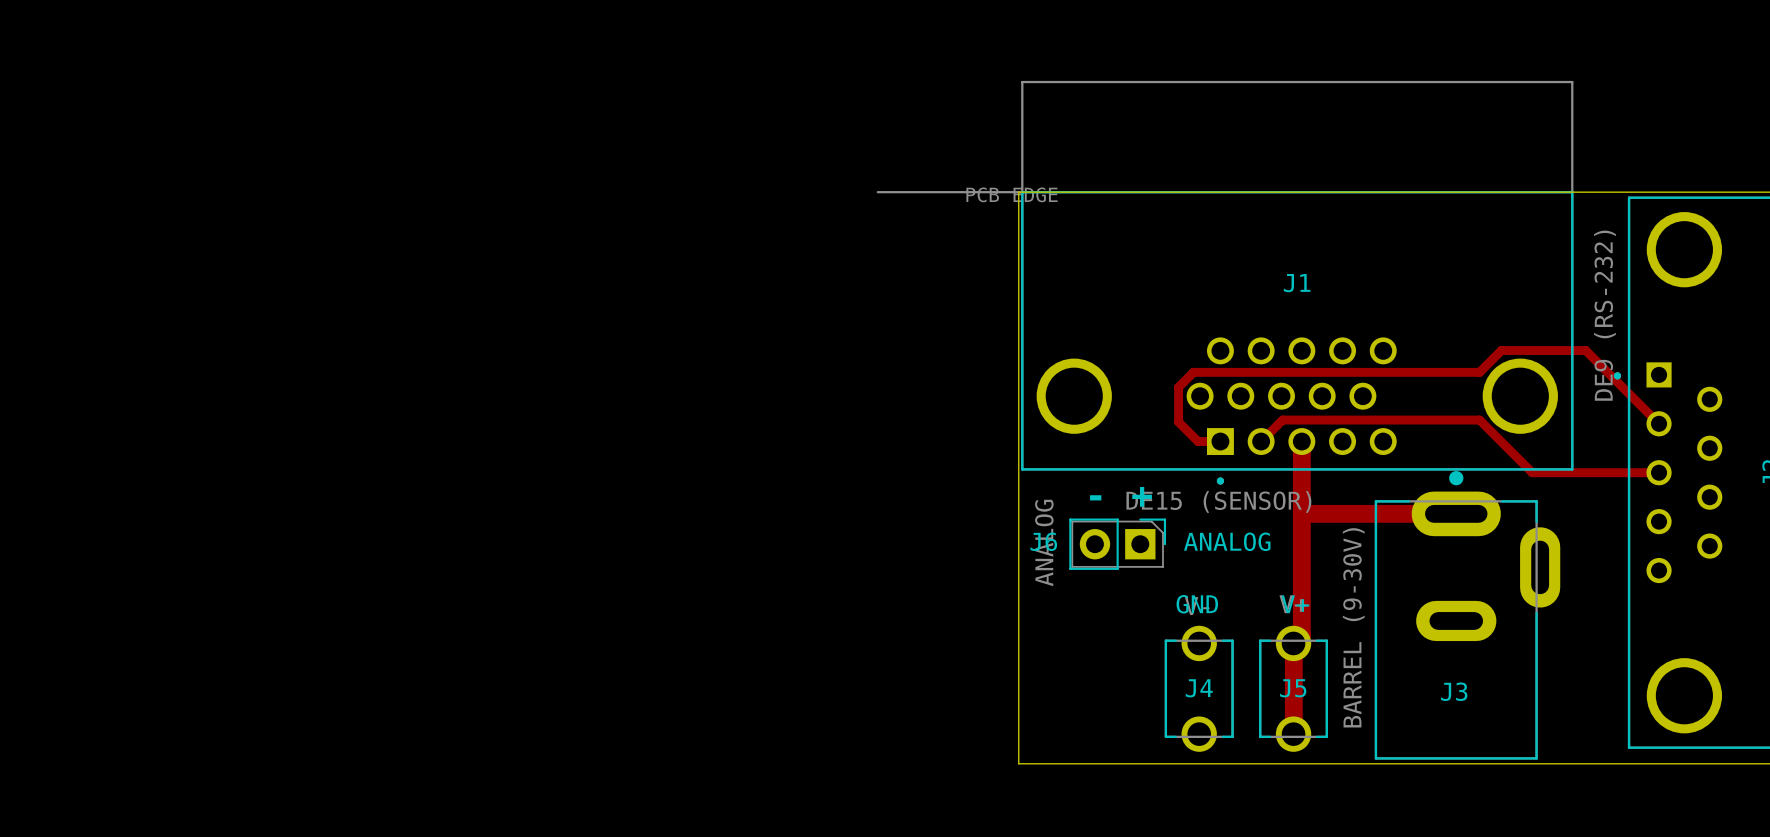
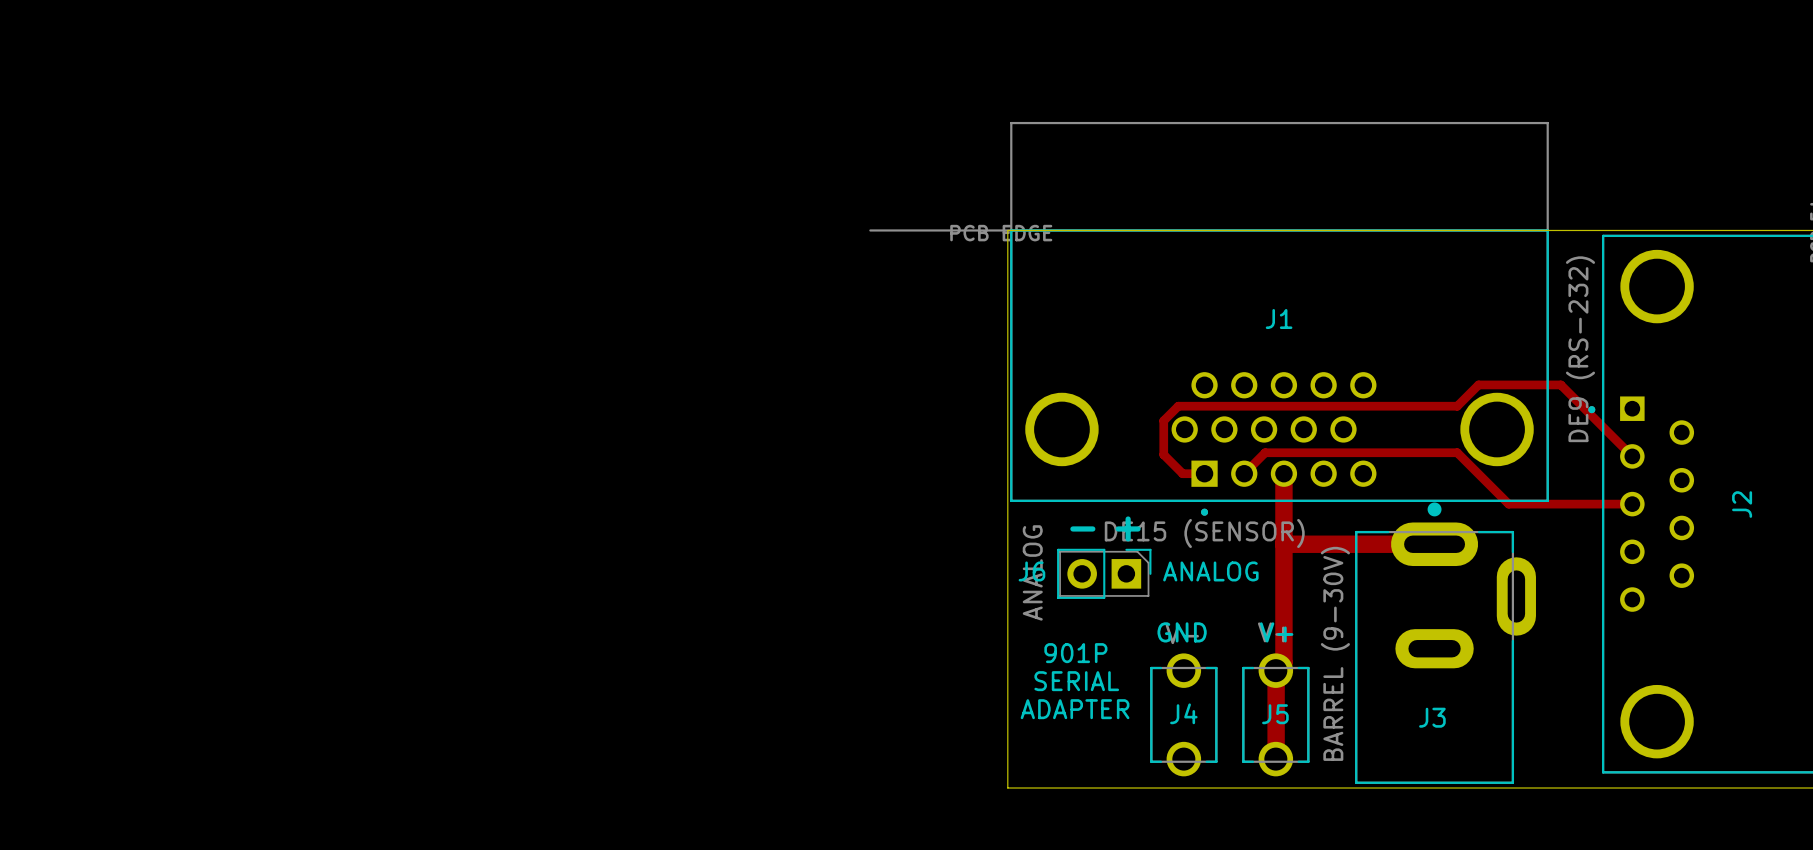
text: none -> 901P (1075, 653)
text: none -> SERIAL (1076, 681)
text: none -> ADAPTER (1075, 709)

